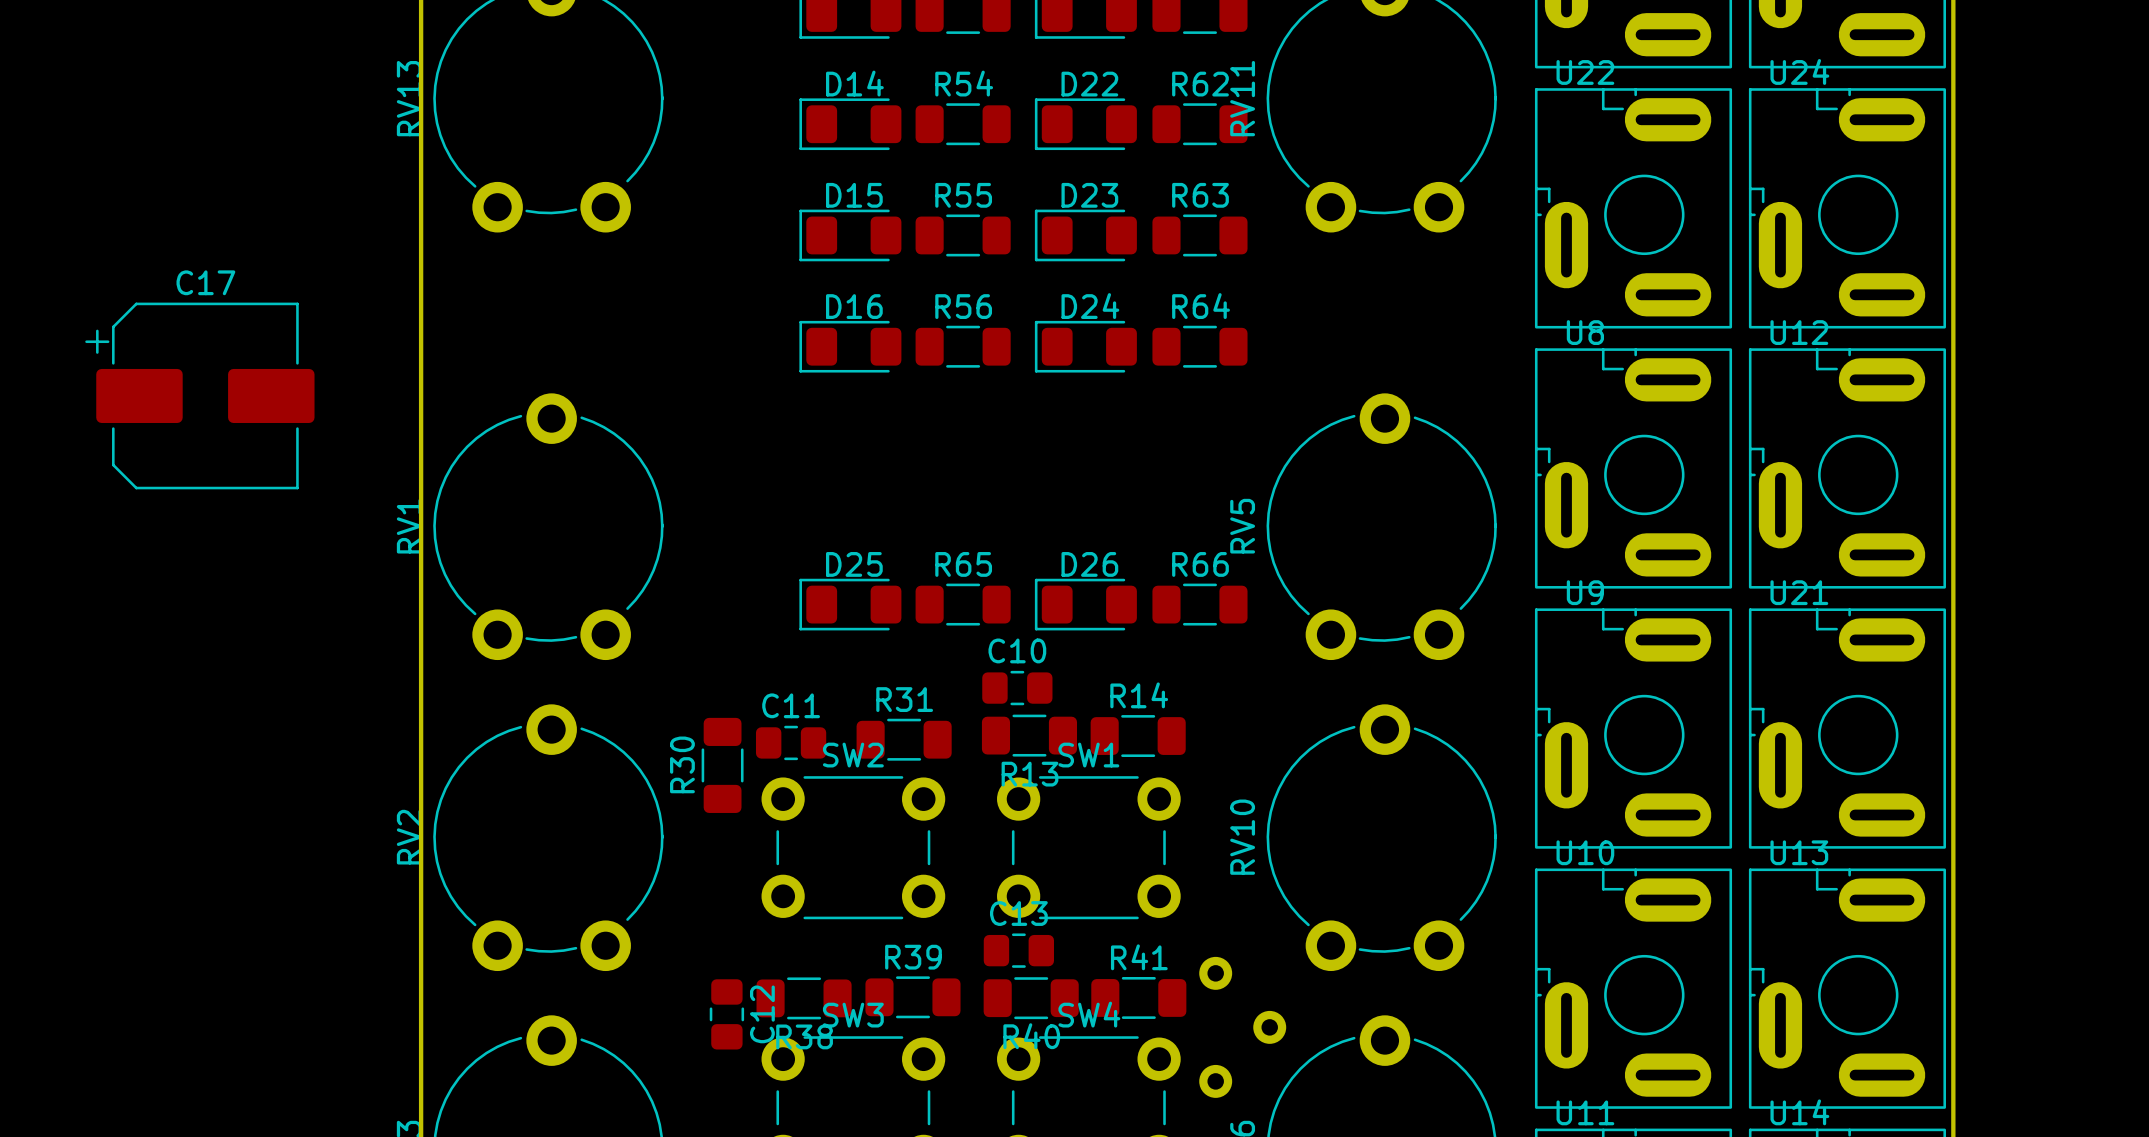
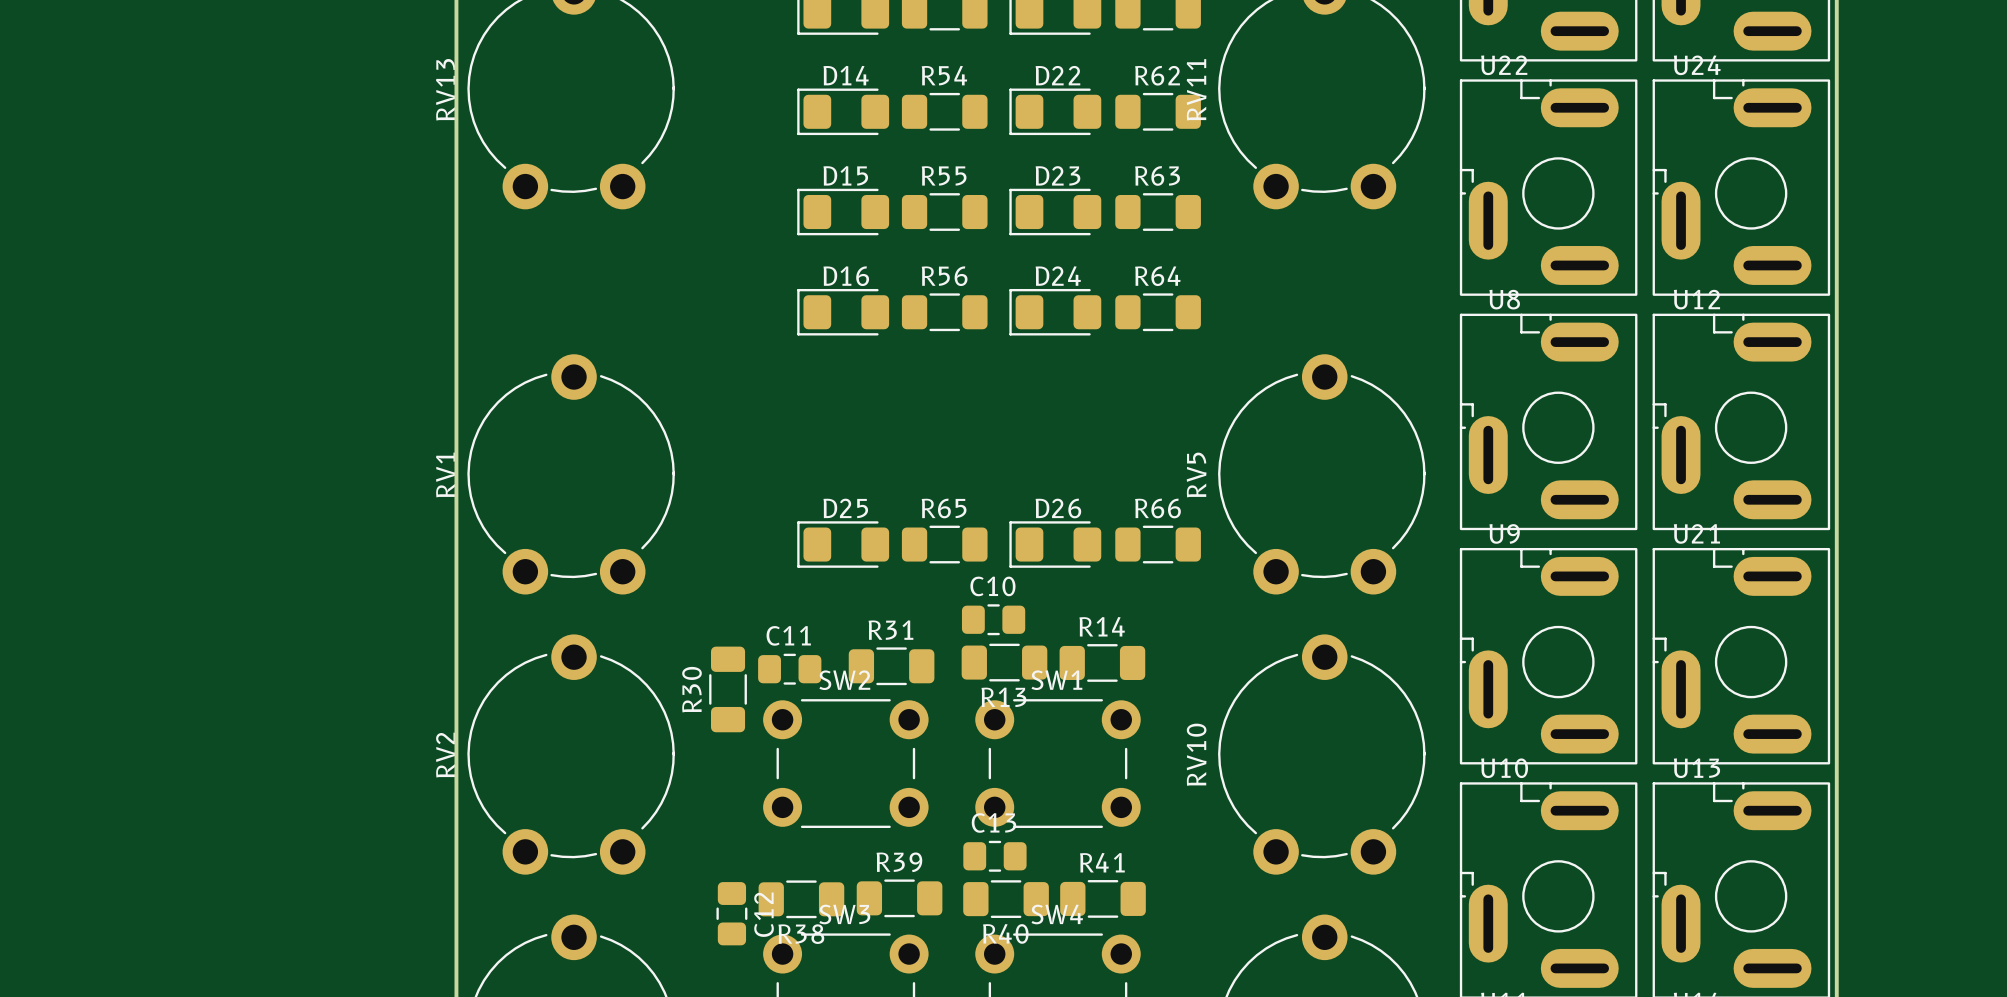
C17: (199, 395) -> none
part: (1242, 1027) -> none

